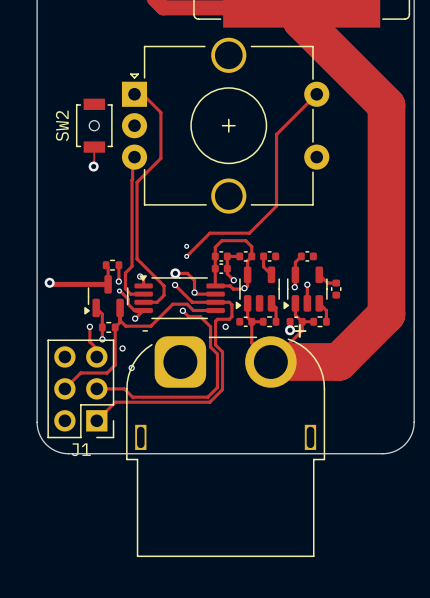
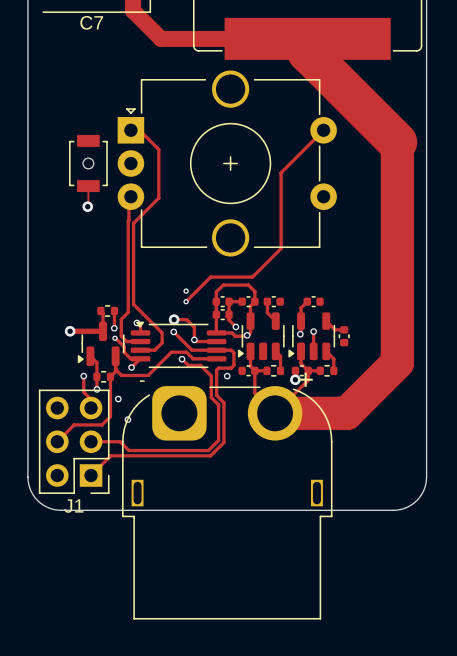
track width: thick (386, 105) (386, 314) (338, 361) (270, 361) -> thin (397, 142) (397, 362) (346, 413) (275, 413)
SW2 name: SW2 (62, 125) -> none
track: (49, 282) (77, 284) -> none
via position: (49, 282) -> (70, 331)

